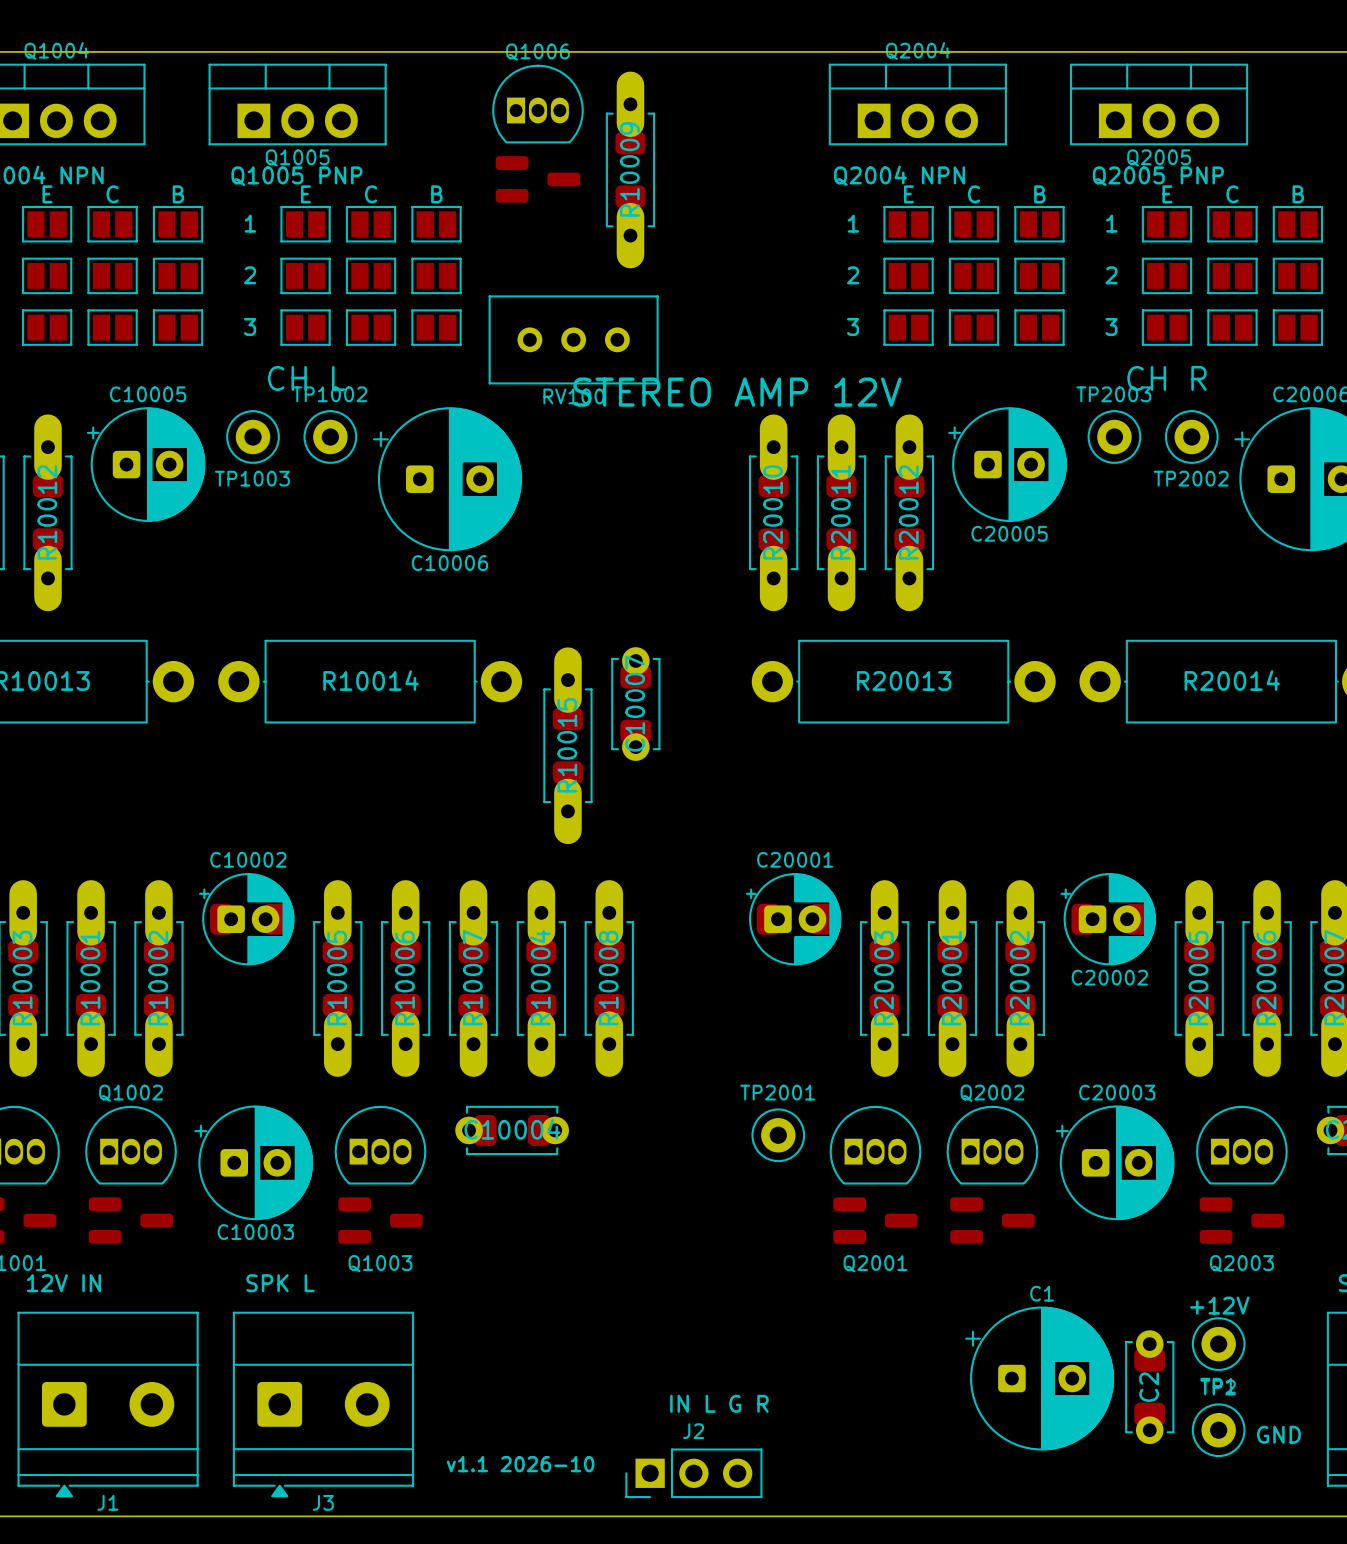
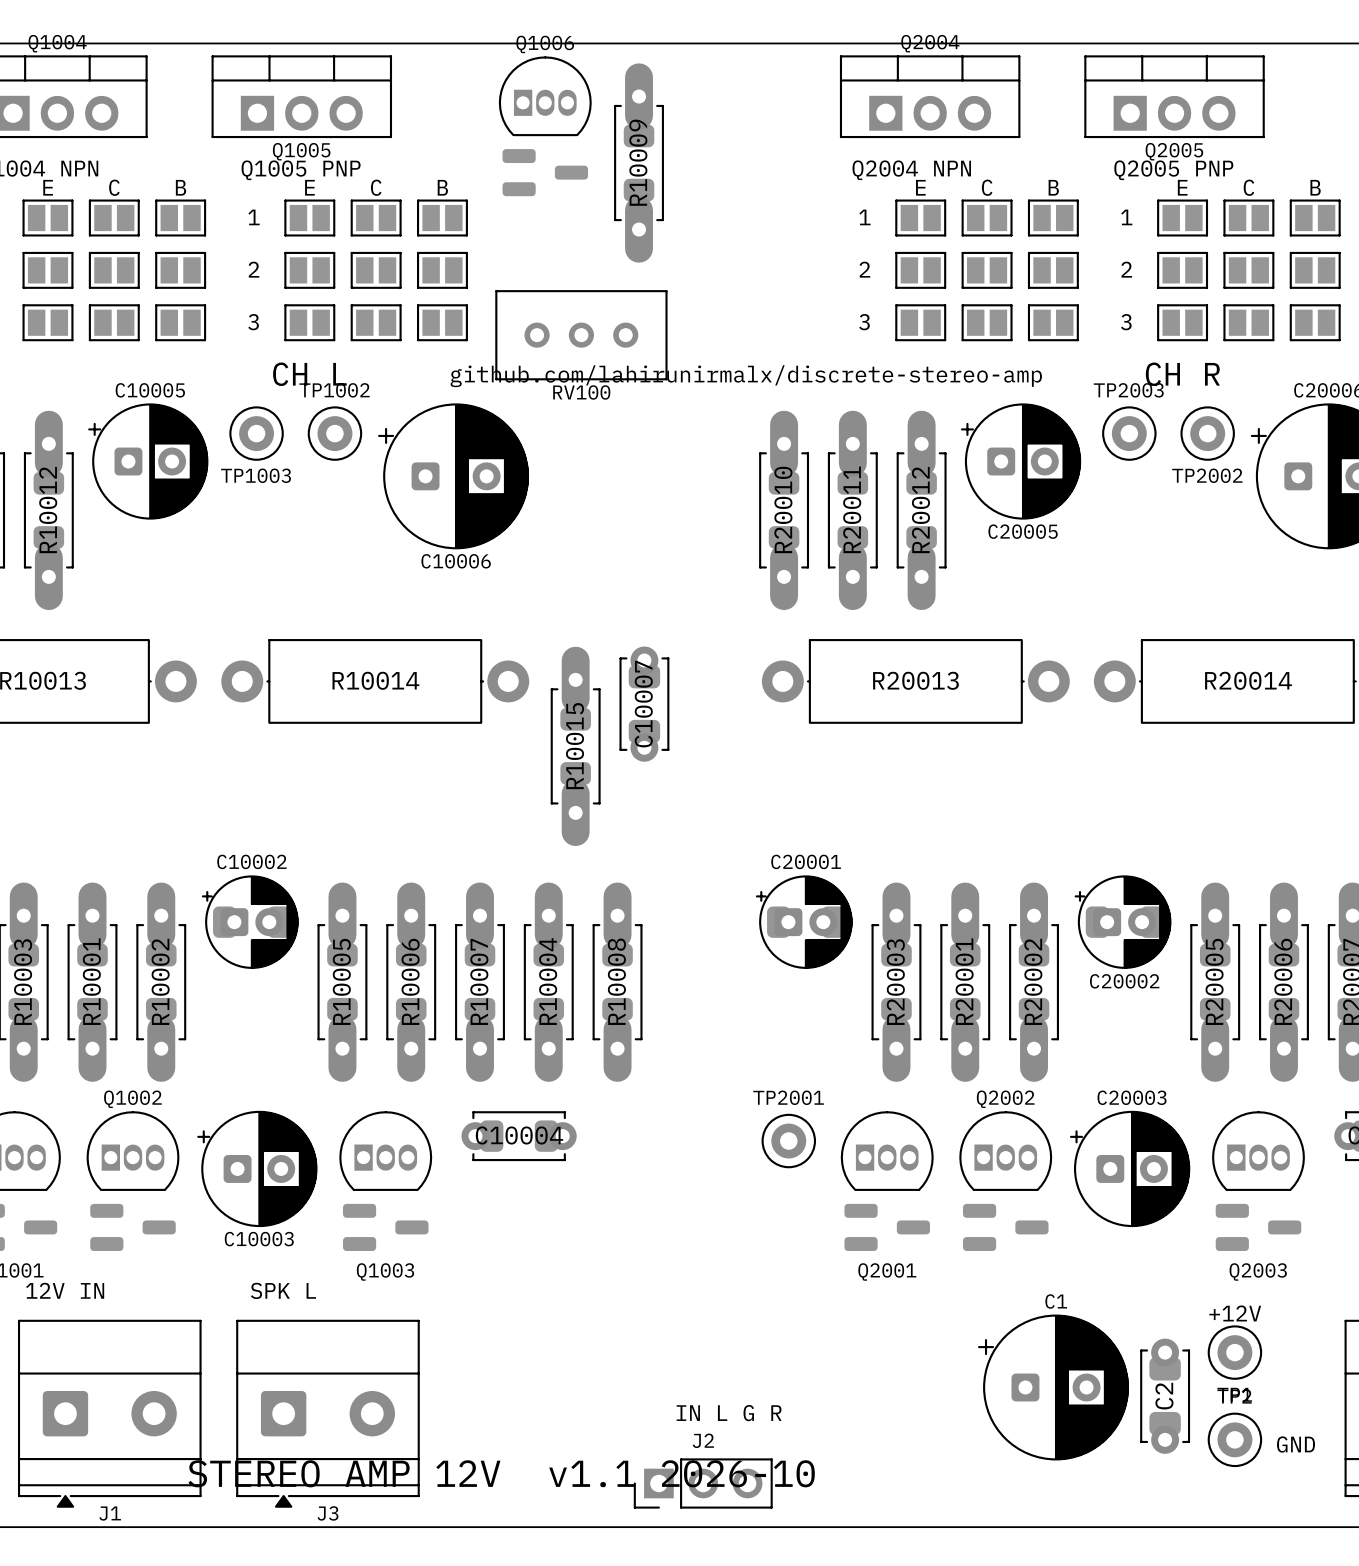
text: STEREO AMP 12V (737, 392) -> github.com/lahirunirmalx/discrete-stereo-amp (746, 376)
text: none -> STEREO AMP 12V v1.1 2026-10 (501, 1473)
text: v1.1 2026-10 (520, 1464) -> none

